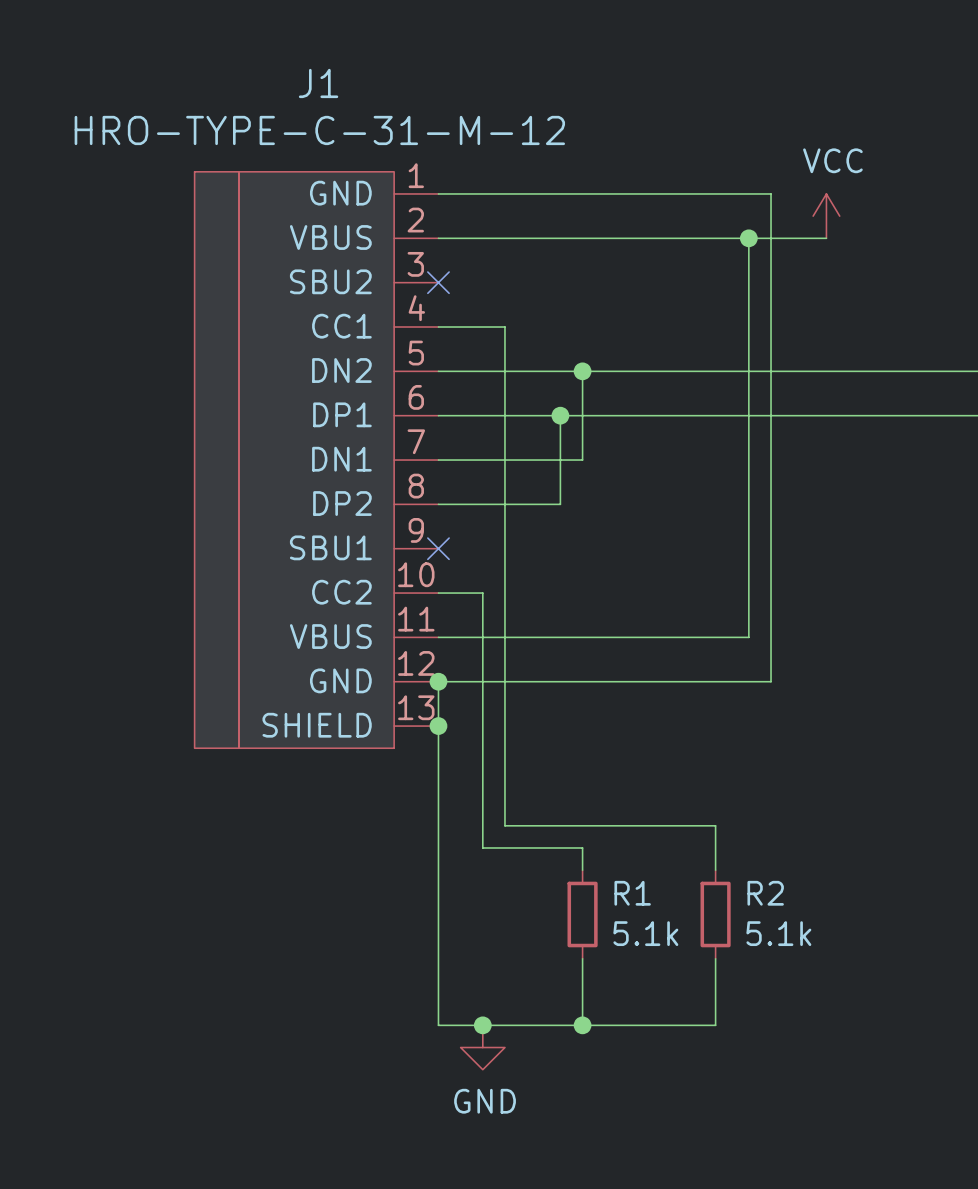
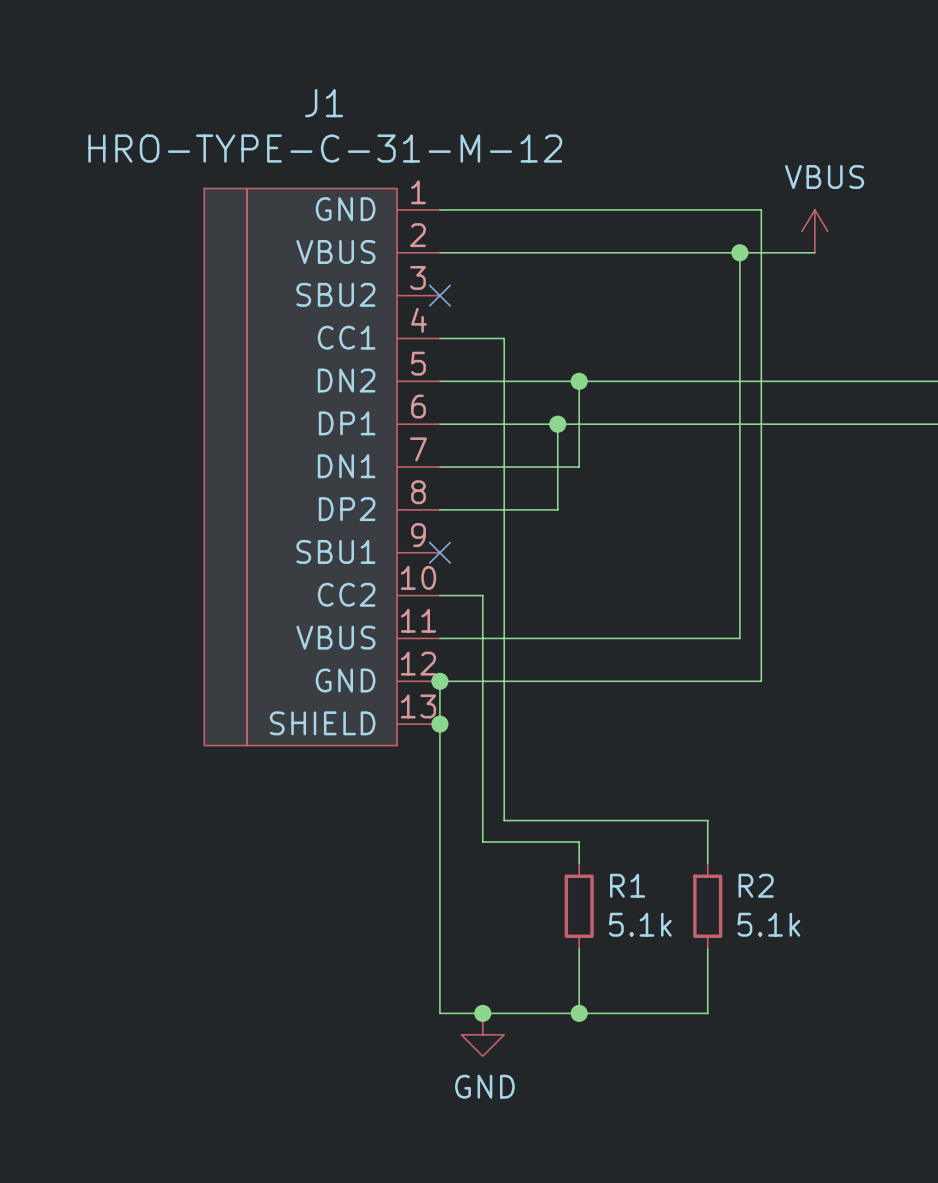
power symbol: VCC (826, 216) -> VBUS (814, 231)

